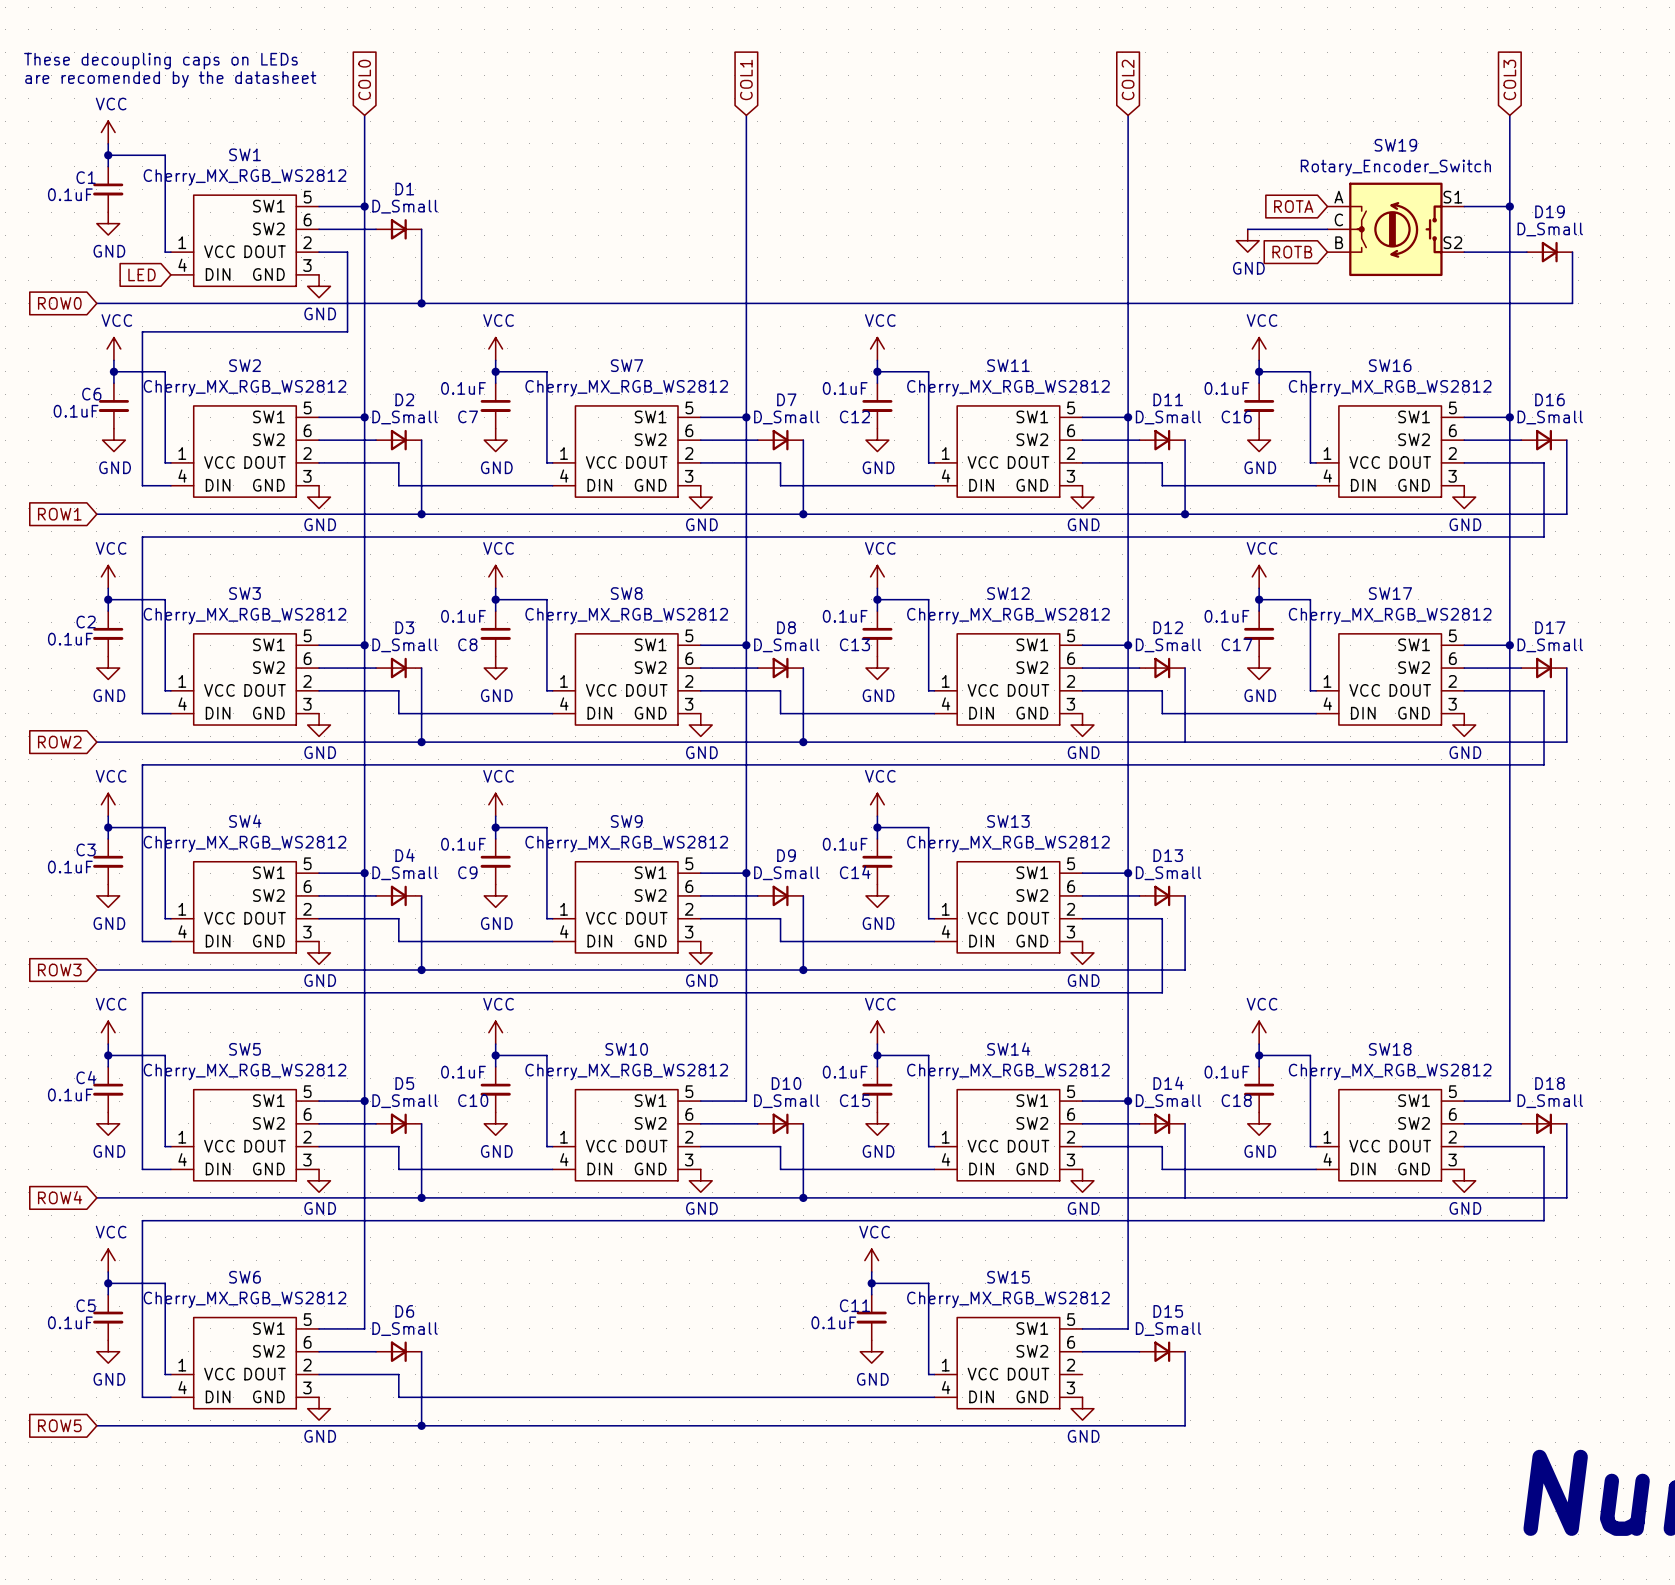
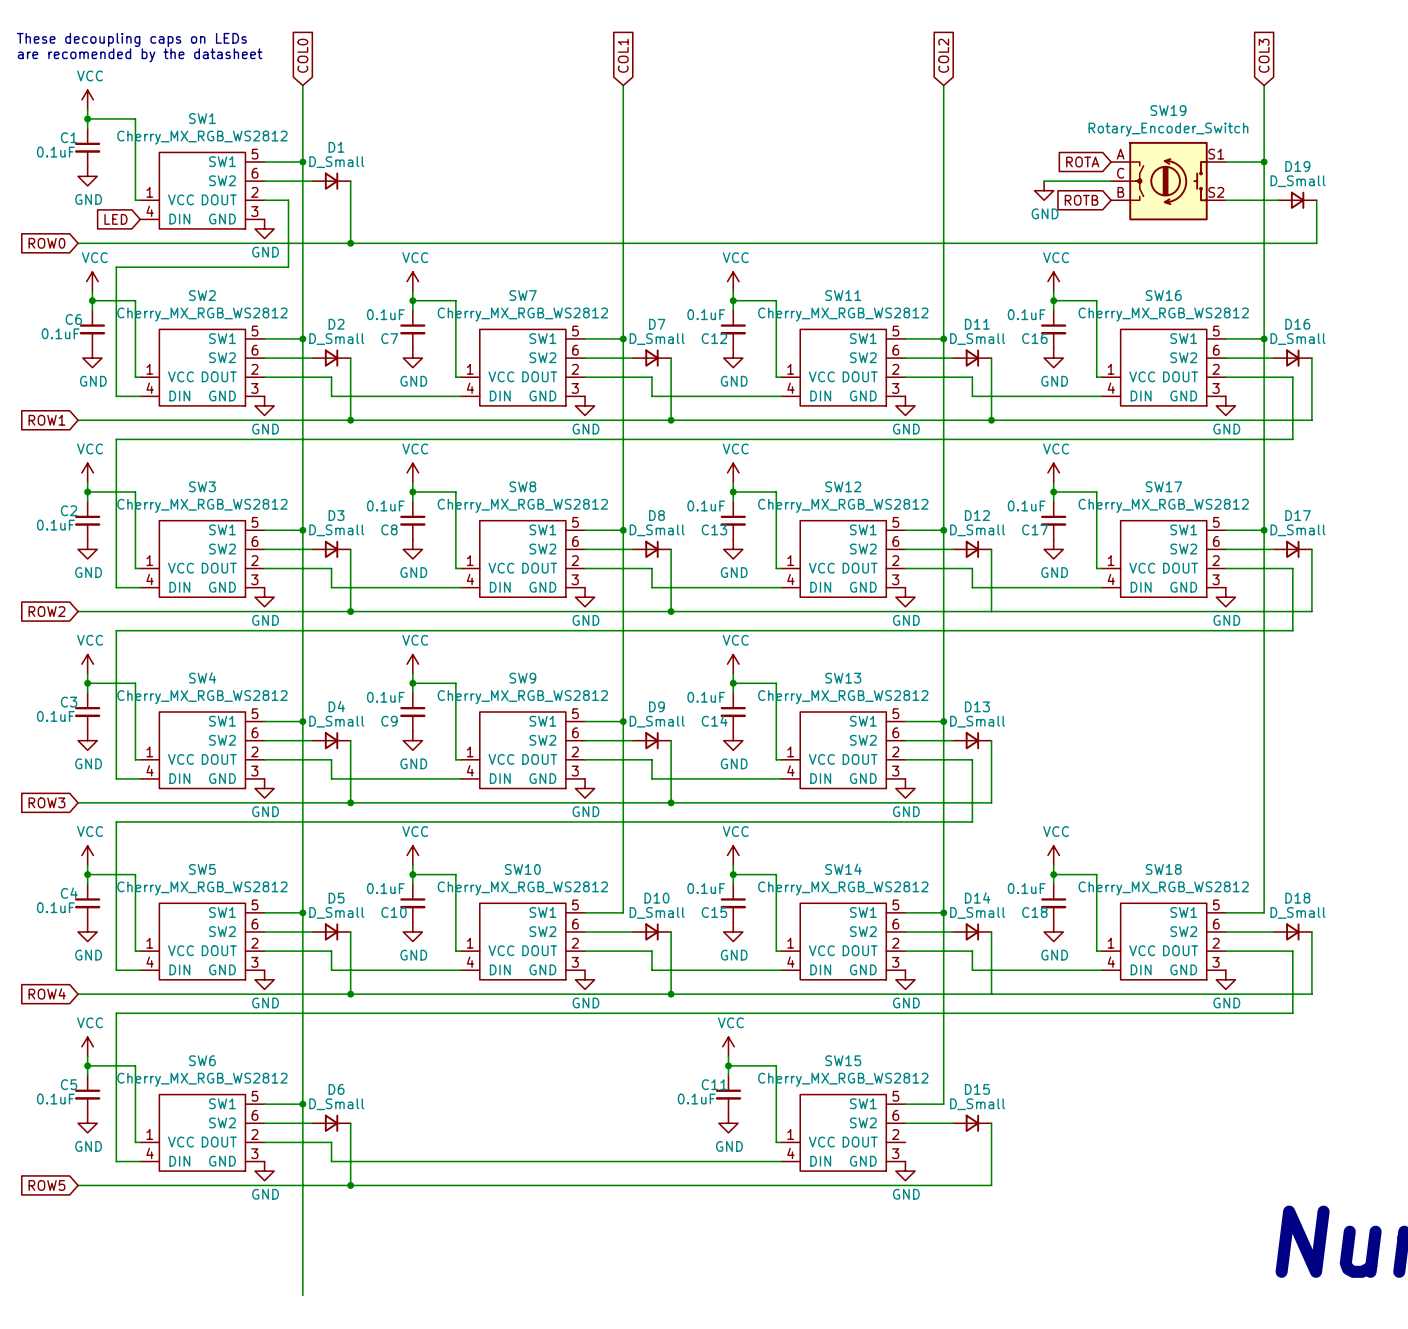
wire: none -> (302, 1104) (302, 1295)
junction: none -> (302, 1104)

